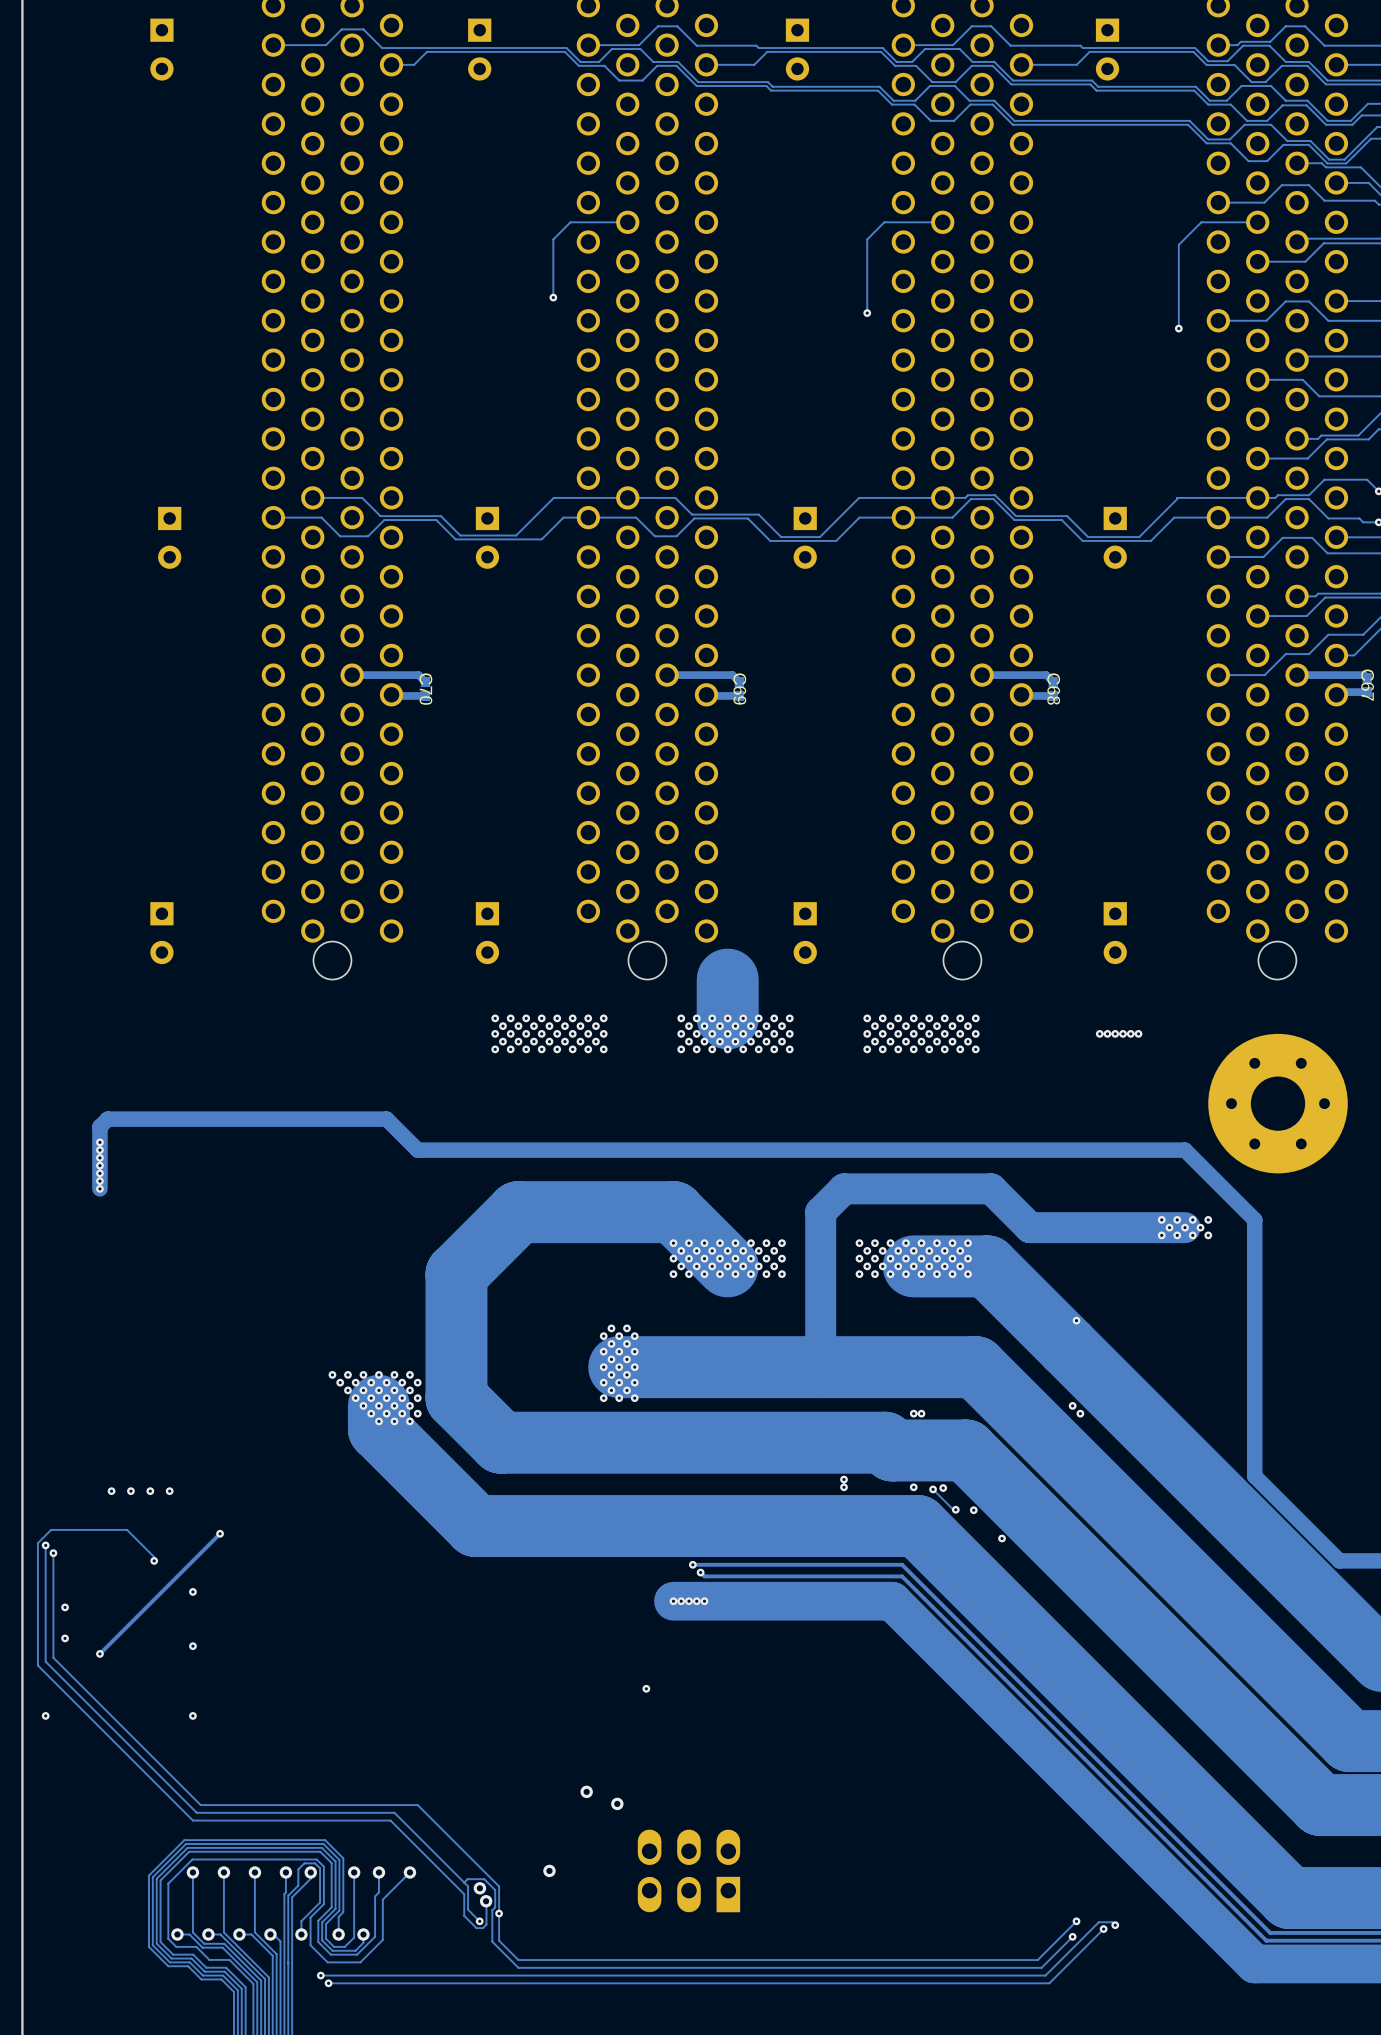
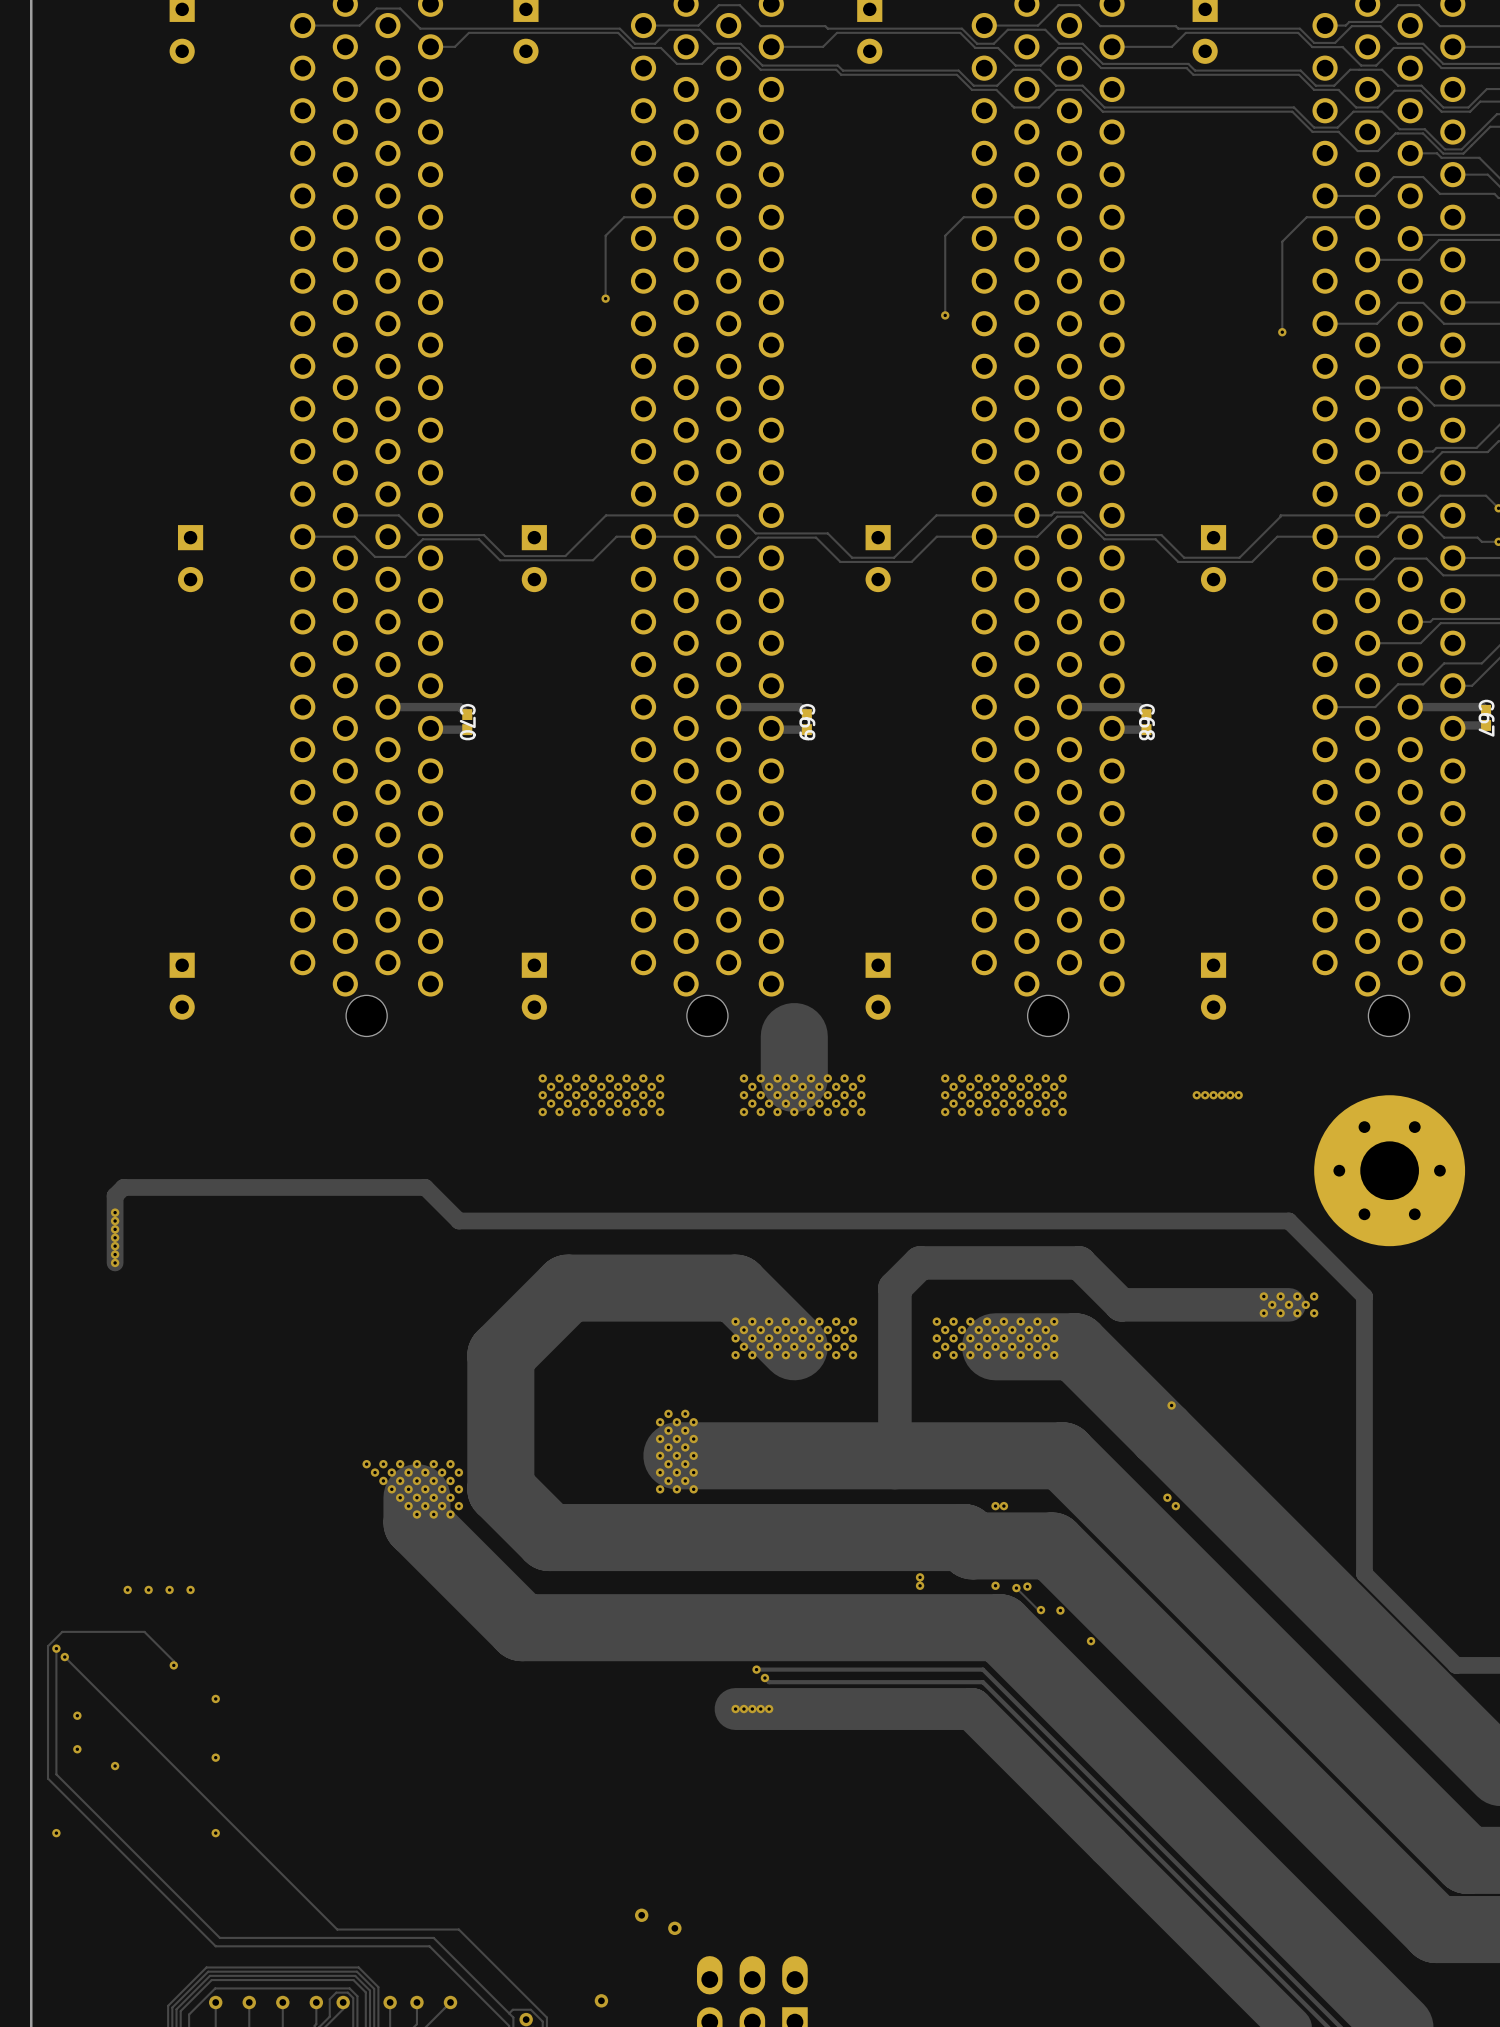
track: (220, 1533) (99, 1653) -> none
via: (220, 1533) -> none
track: (53, 1553) (53, 1657) (200, 1805) (305, 1805) -> (64, 1657) (337, 1929)
via: (646, 1688) -> none

